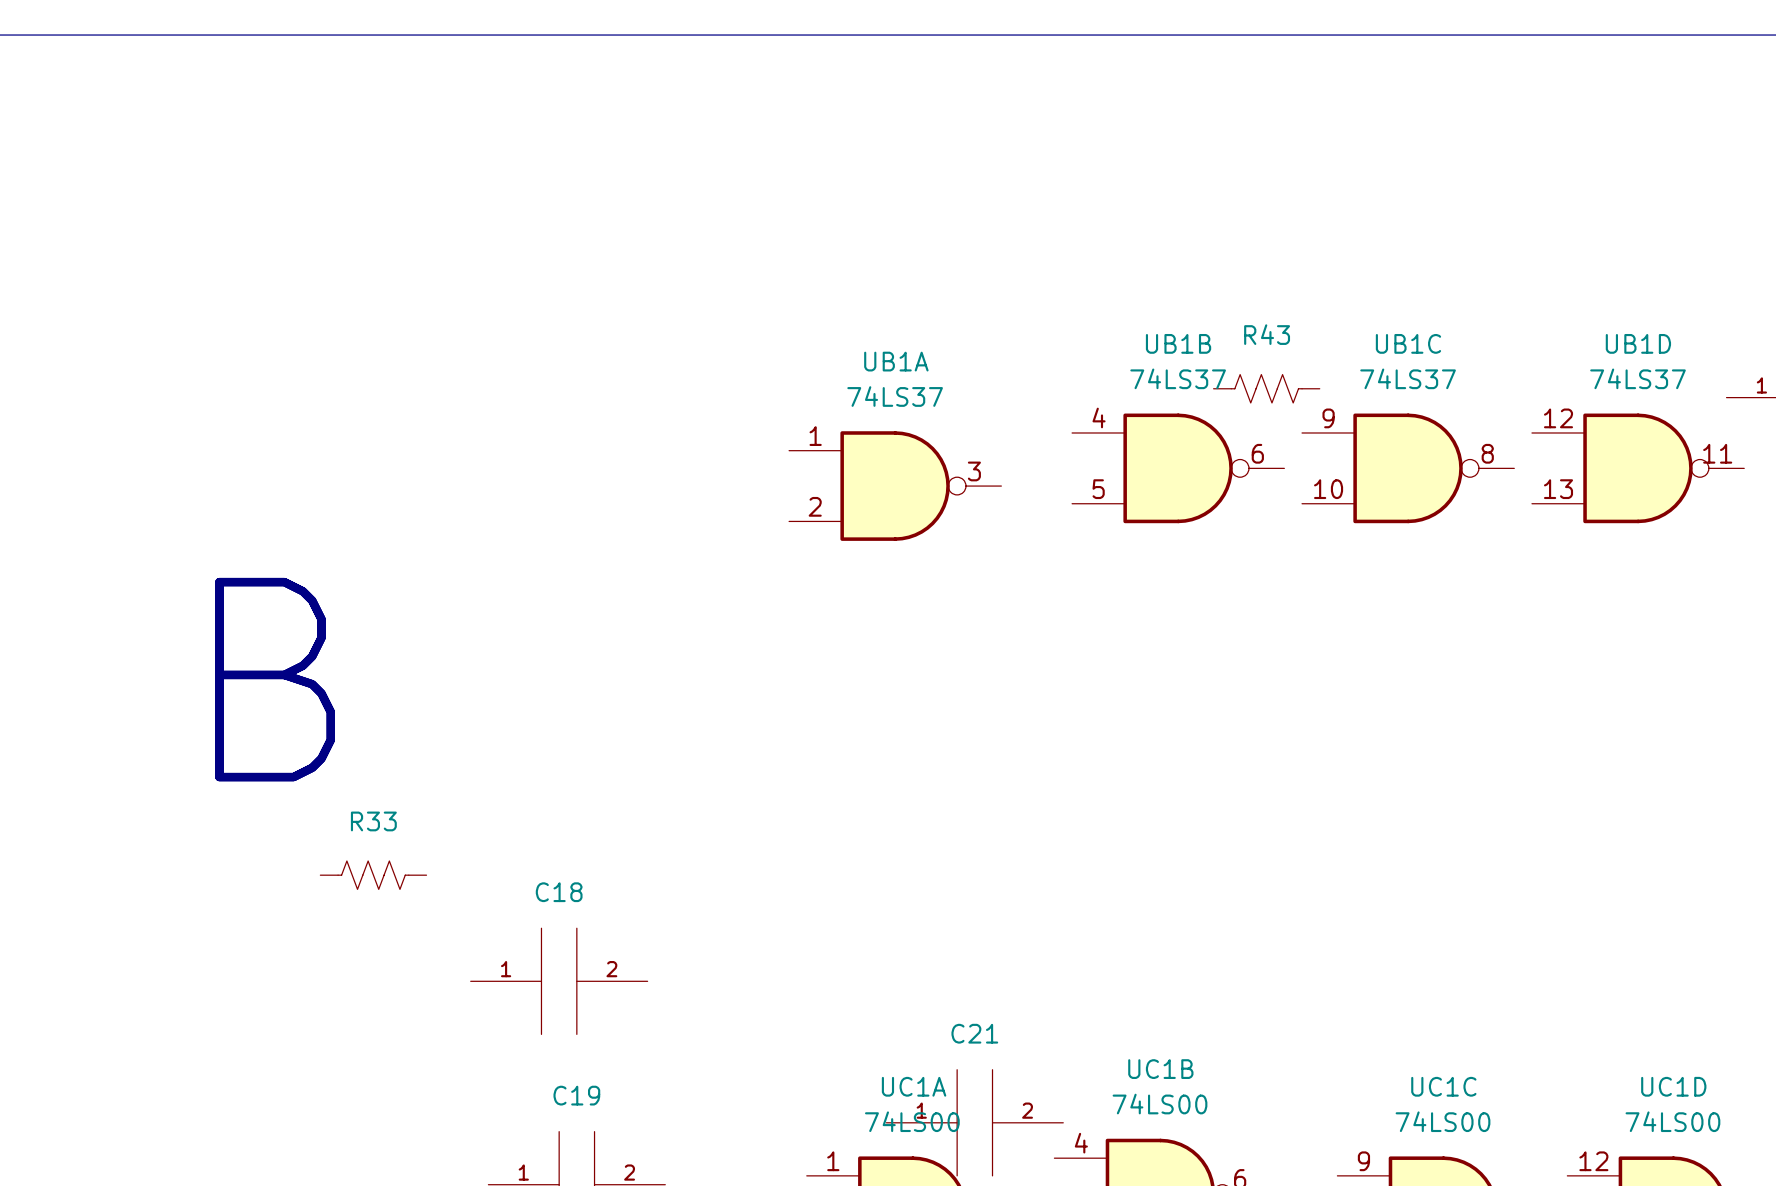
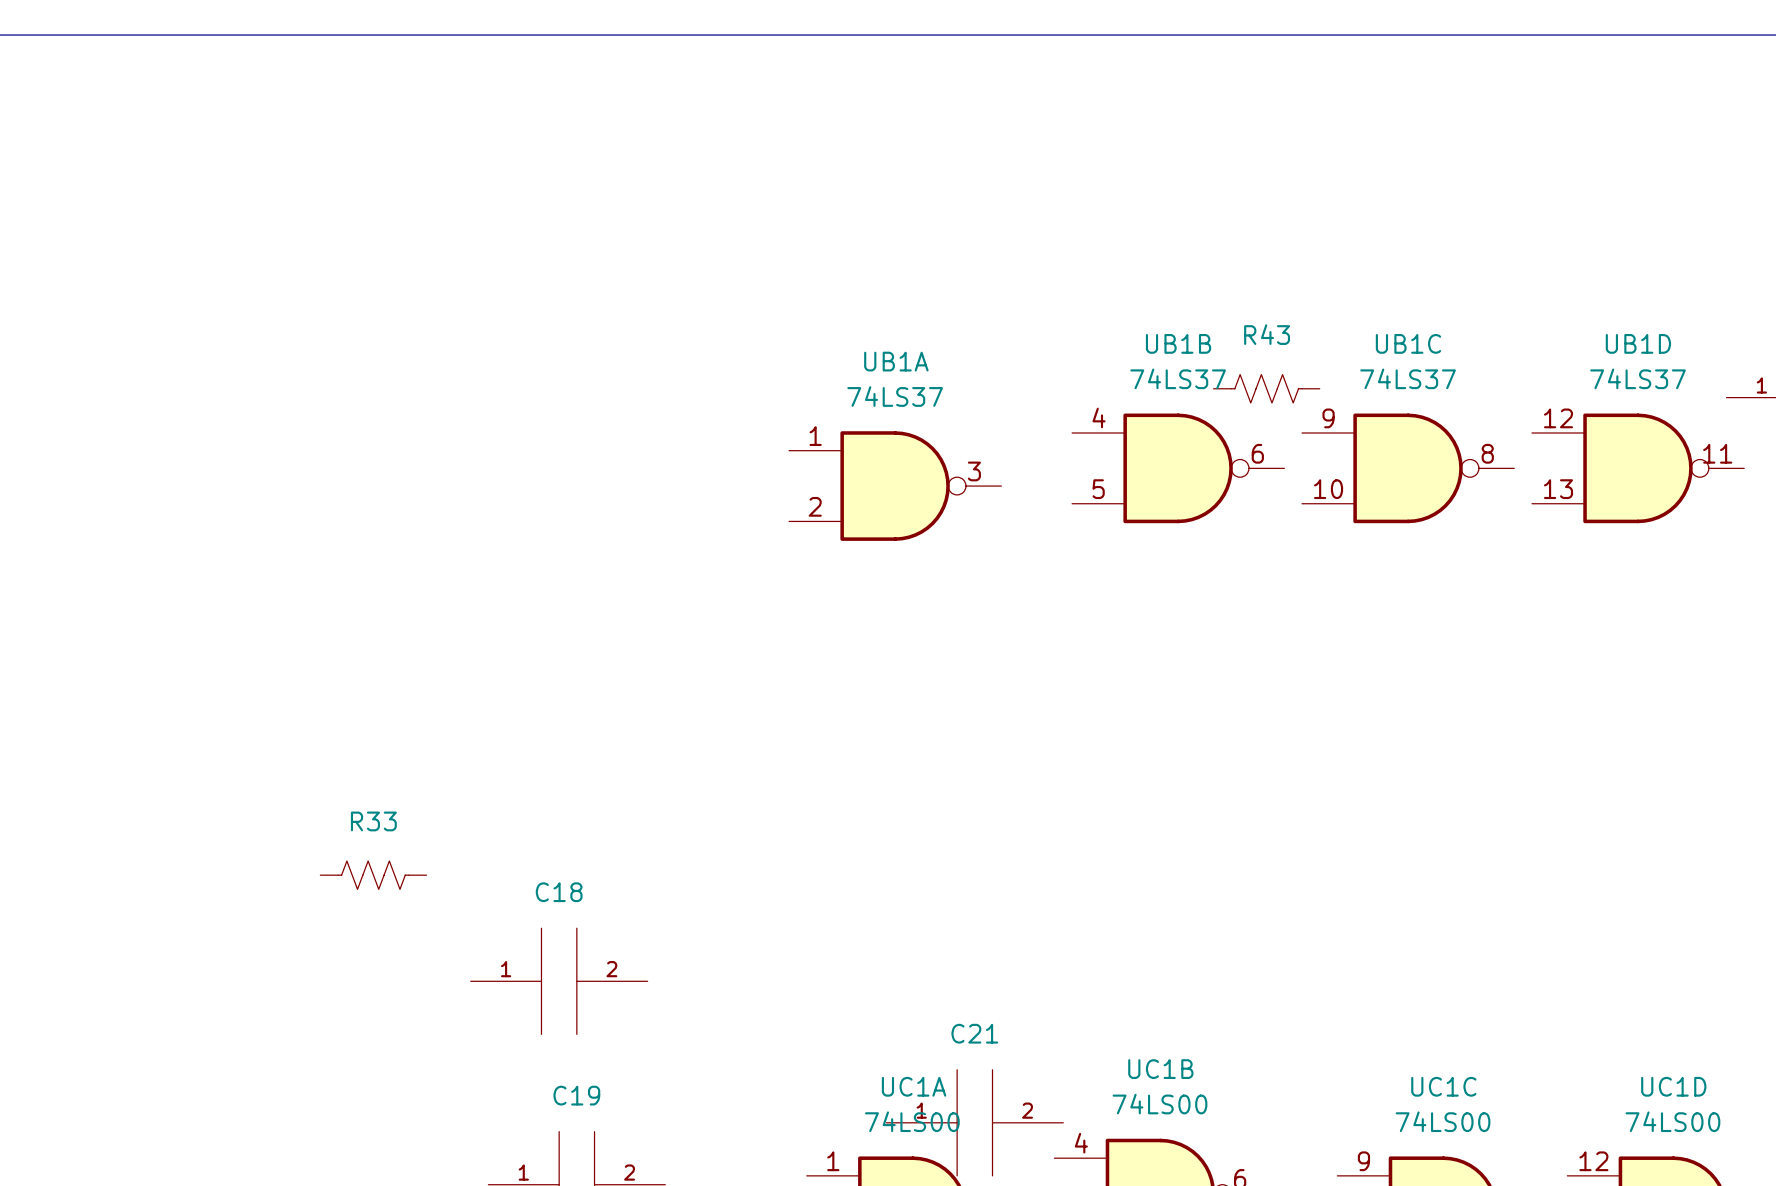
text: B (275, 679) -> none

